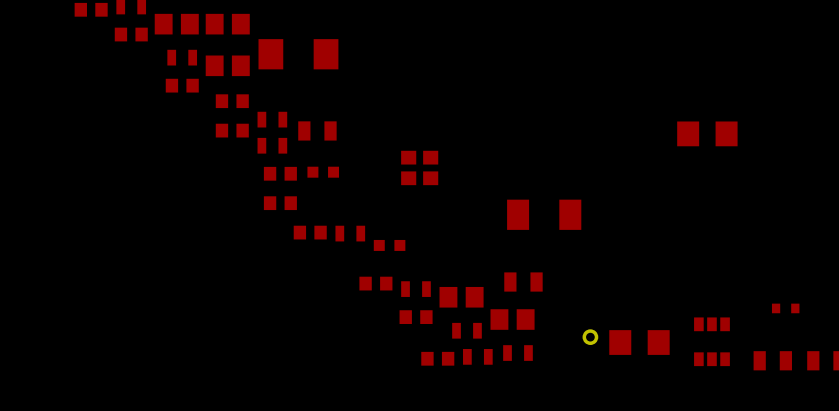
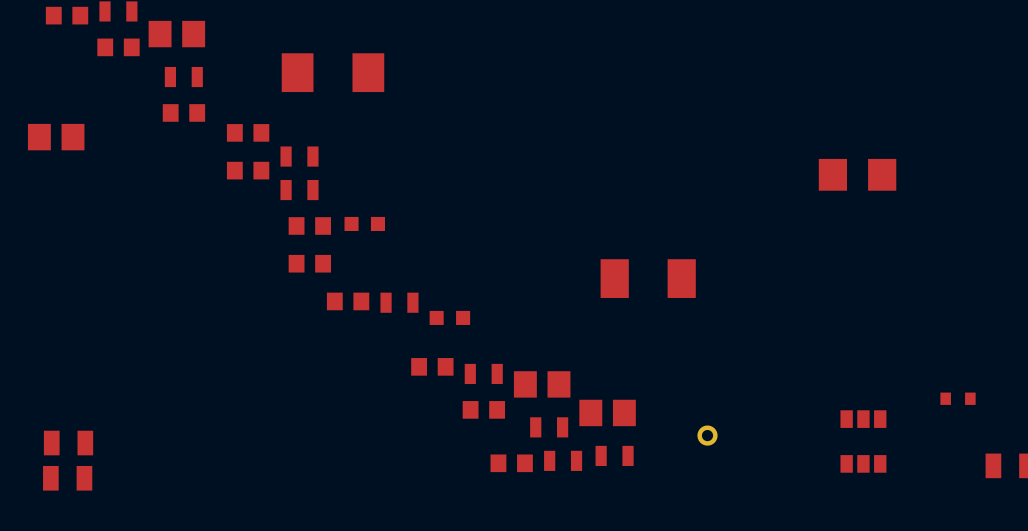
part: (227, 24) -> none
part: (227, 65) -> none
part: none -> (56, 137)
part: (317, 130) -> none
part: (419, 167) -> none
part: (523, 282) -> none
part: none -> (68, 443)
part: (639, 342) -> none
part: (772, 360) -> none
part: none -> (67, 478)

